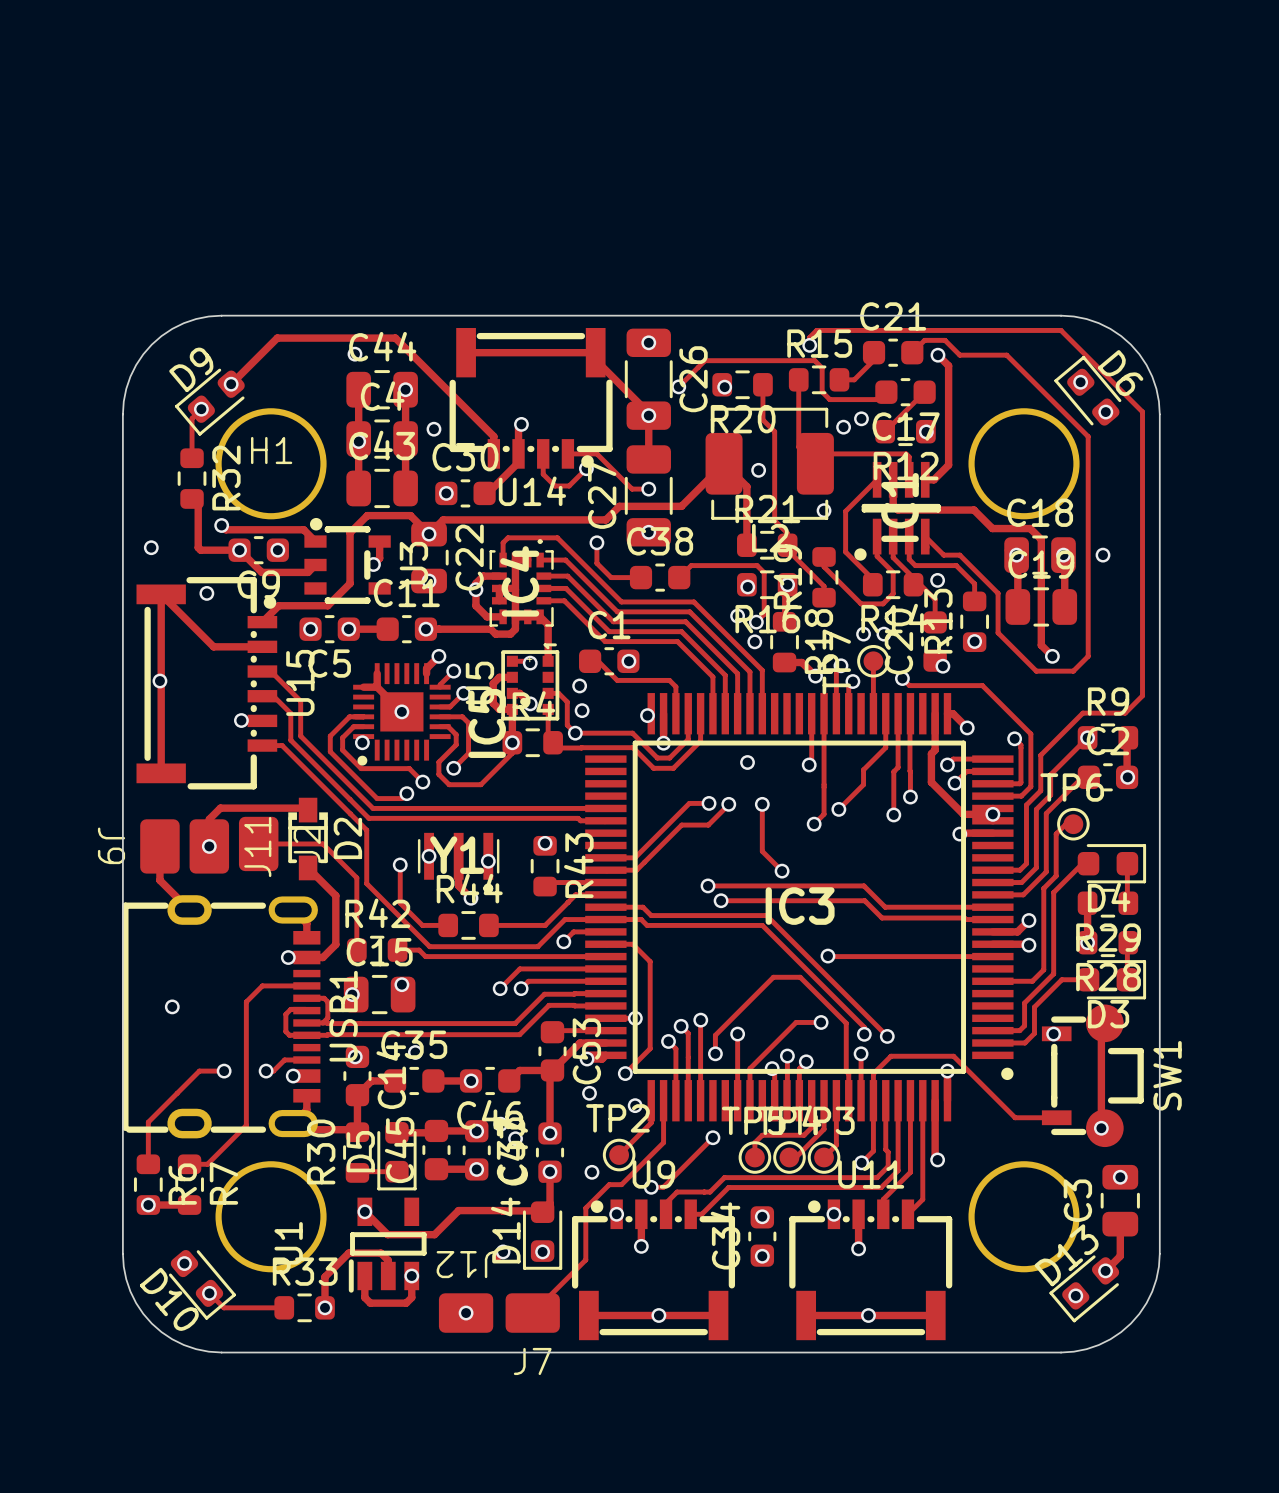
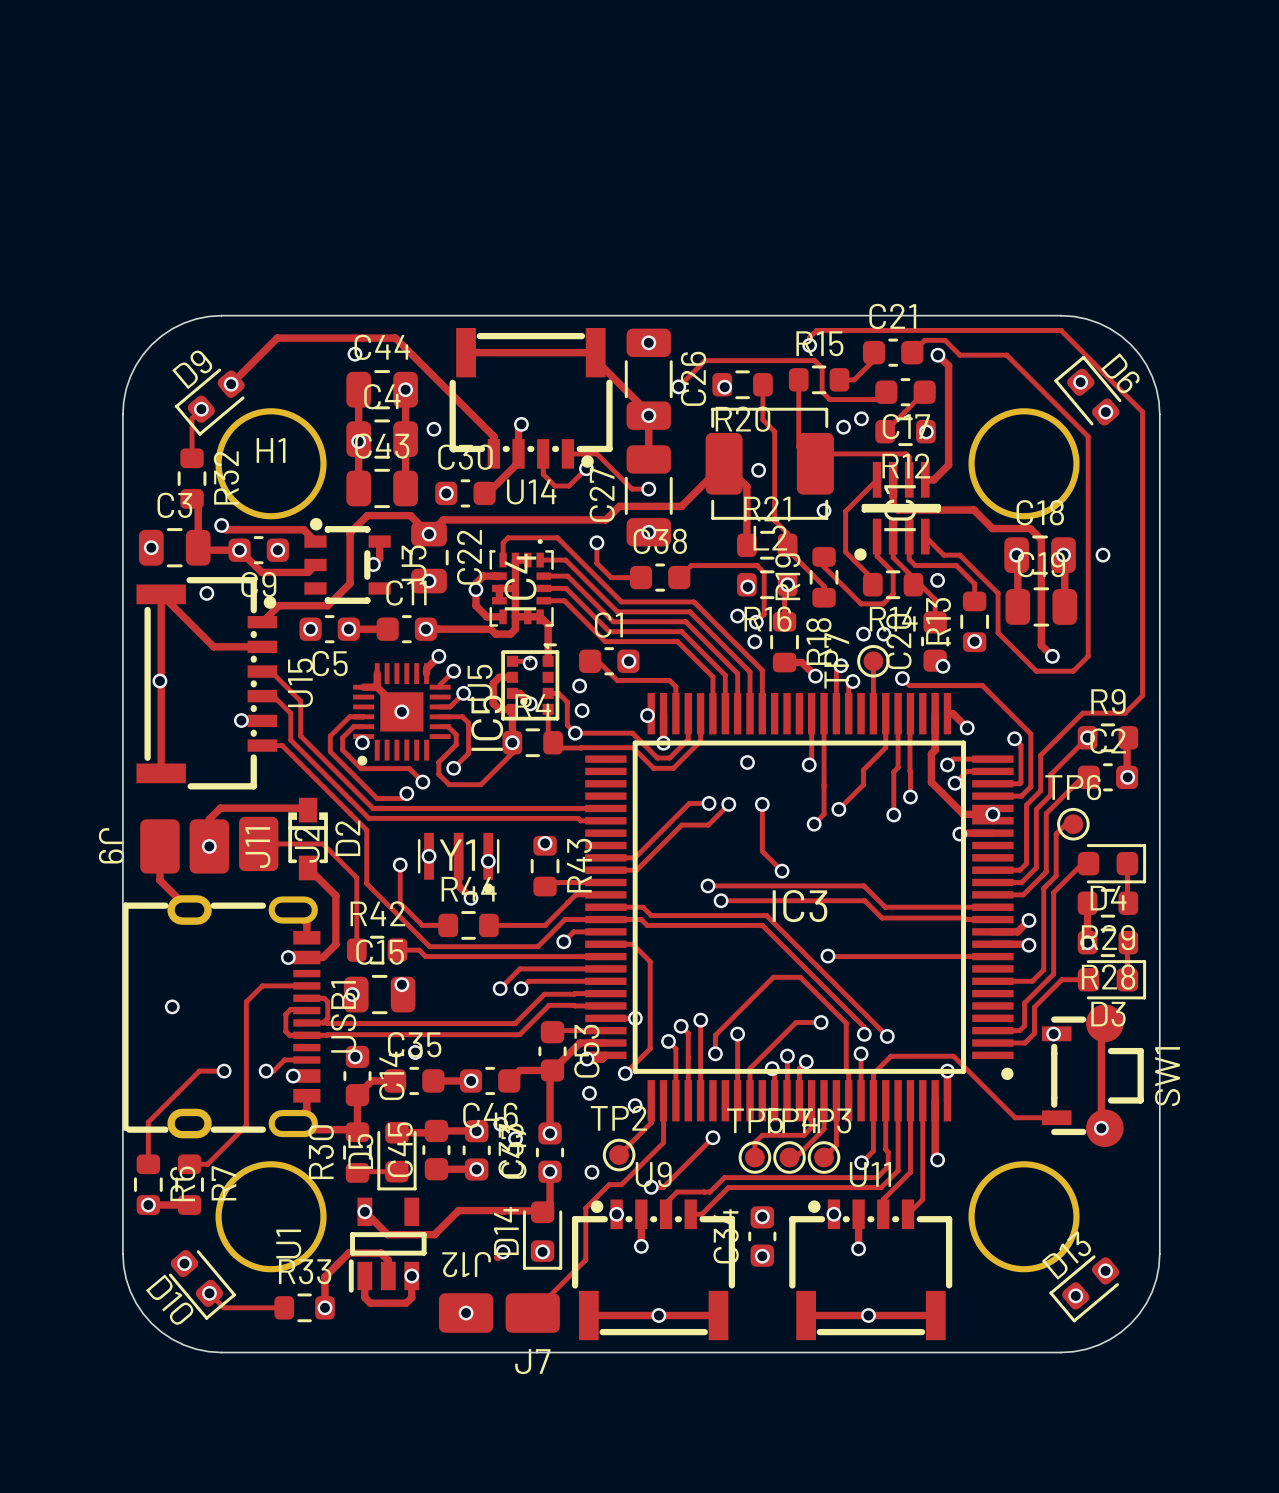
via: (1120, 1177) -> none
C3 rotation: 0° (1120, 1200) -> 90° clockwise (174, 547)
C3 position: (1120, 1200) -> (174, 547)
track: (1120, 1224) (1120, 1256) (1105, 1270) -> none

